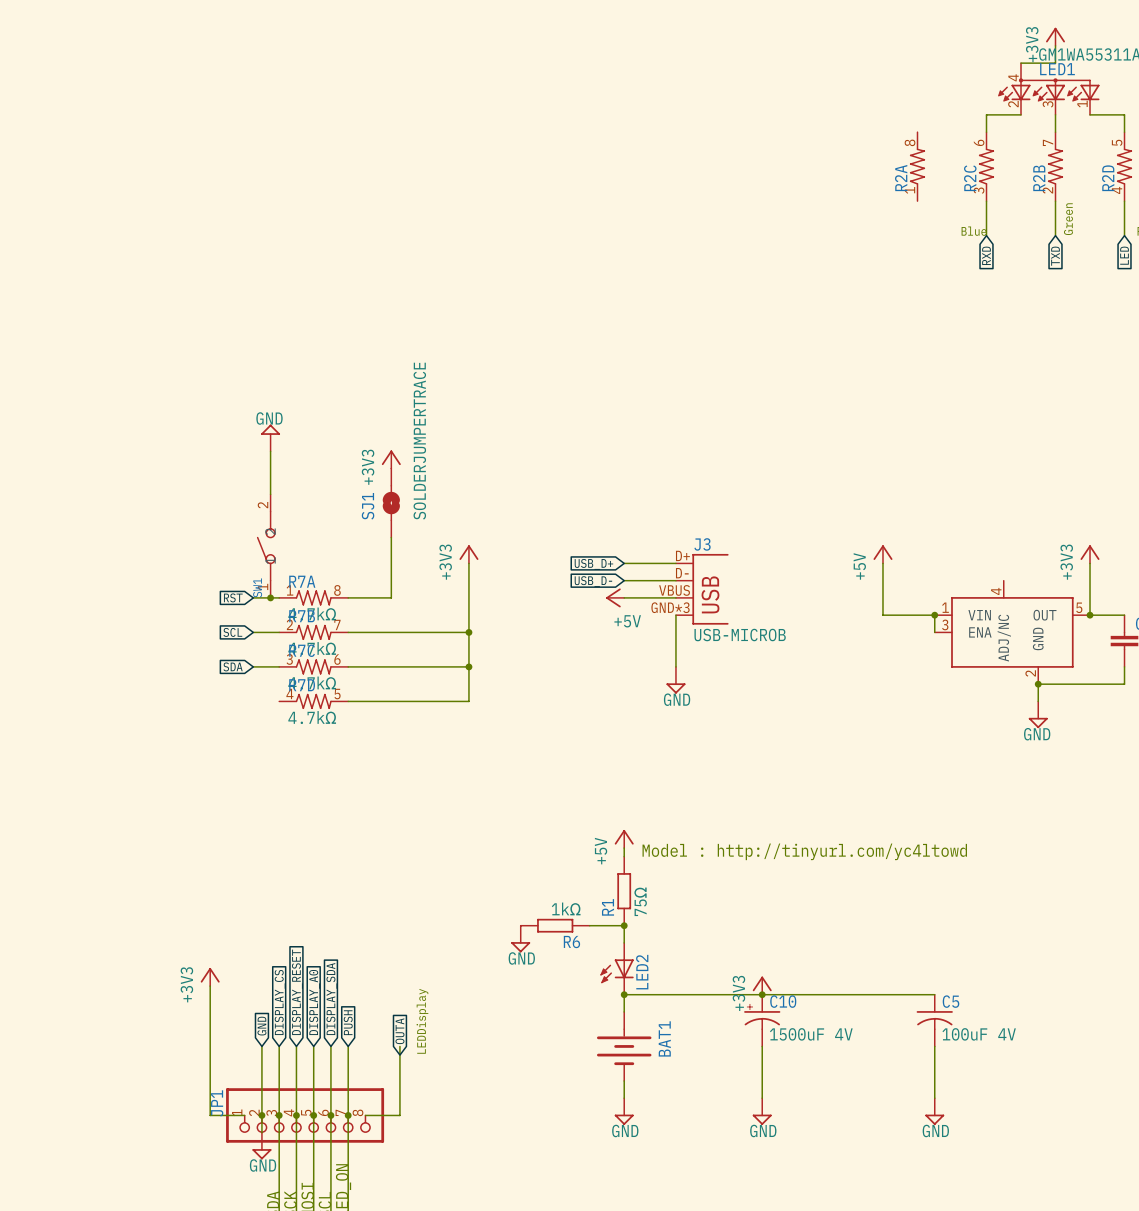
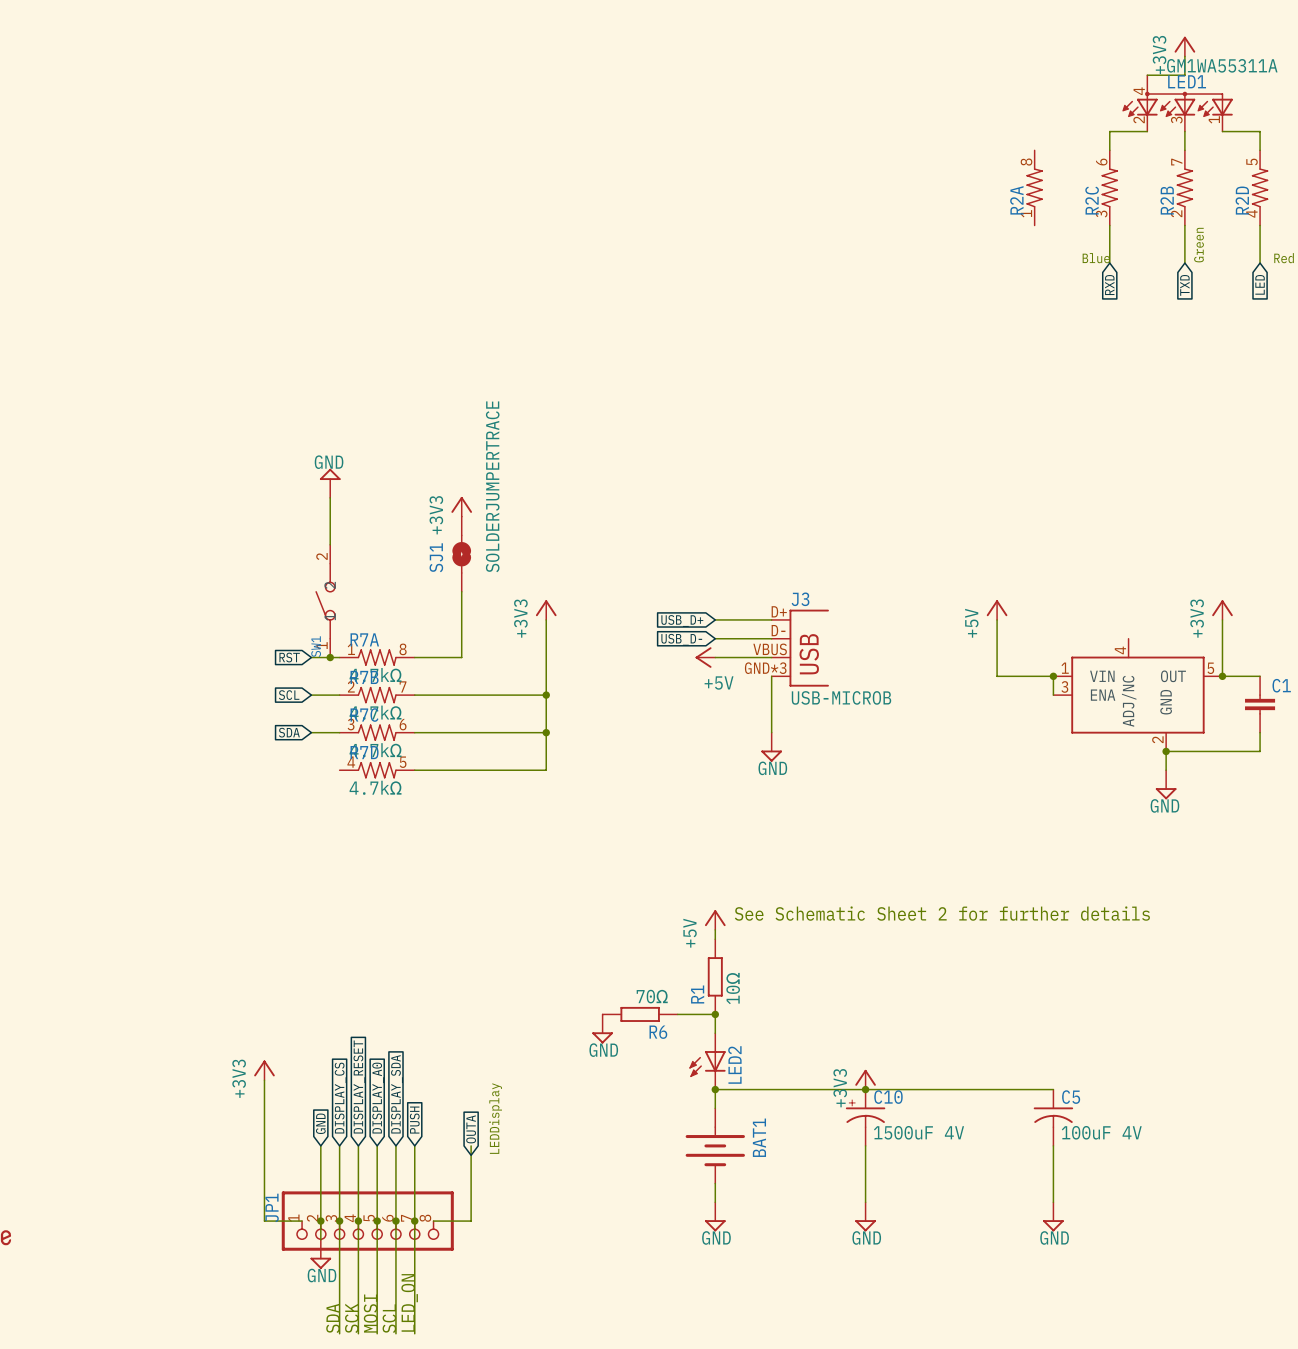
text: none -> See Schematic Sheet 2 for further details (942, 913)
text: Model : http://tinyurl.com/yc4ltowd (804, 851) -> none
R1 value: 75Ω (640, 901) -> 10Ω (733, 988)
R6 value: 1kΩ (566, 908) -> 70Ω (652, 996)

